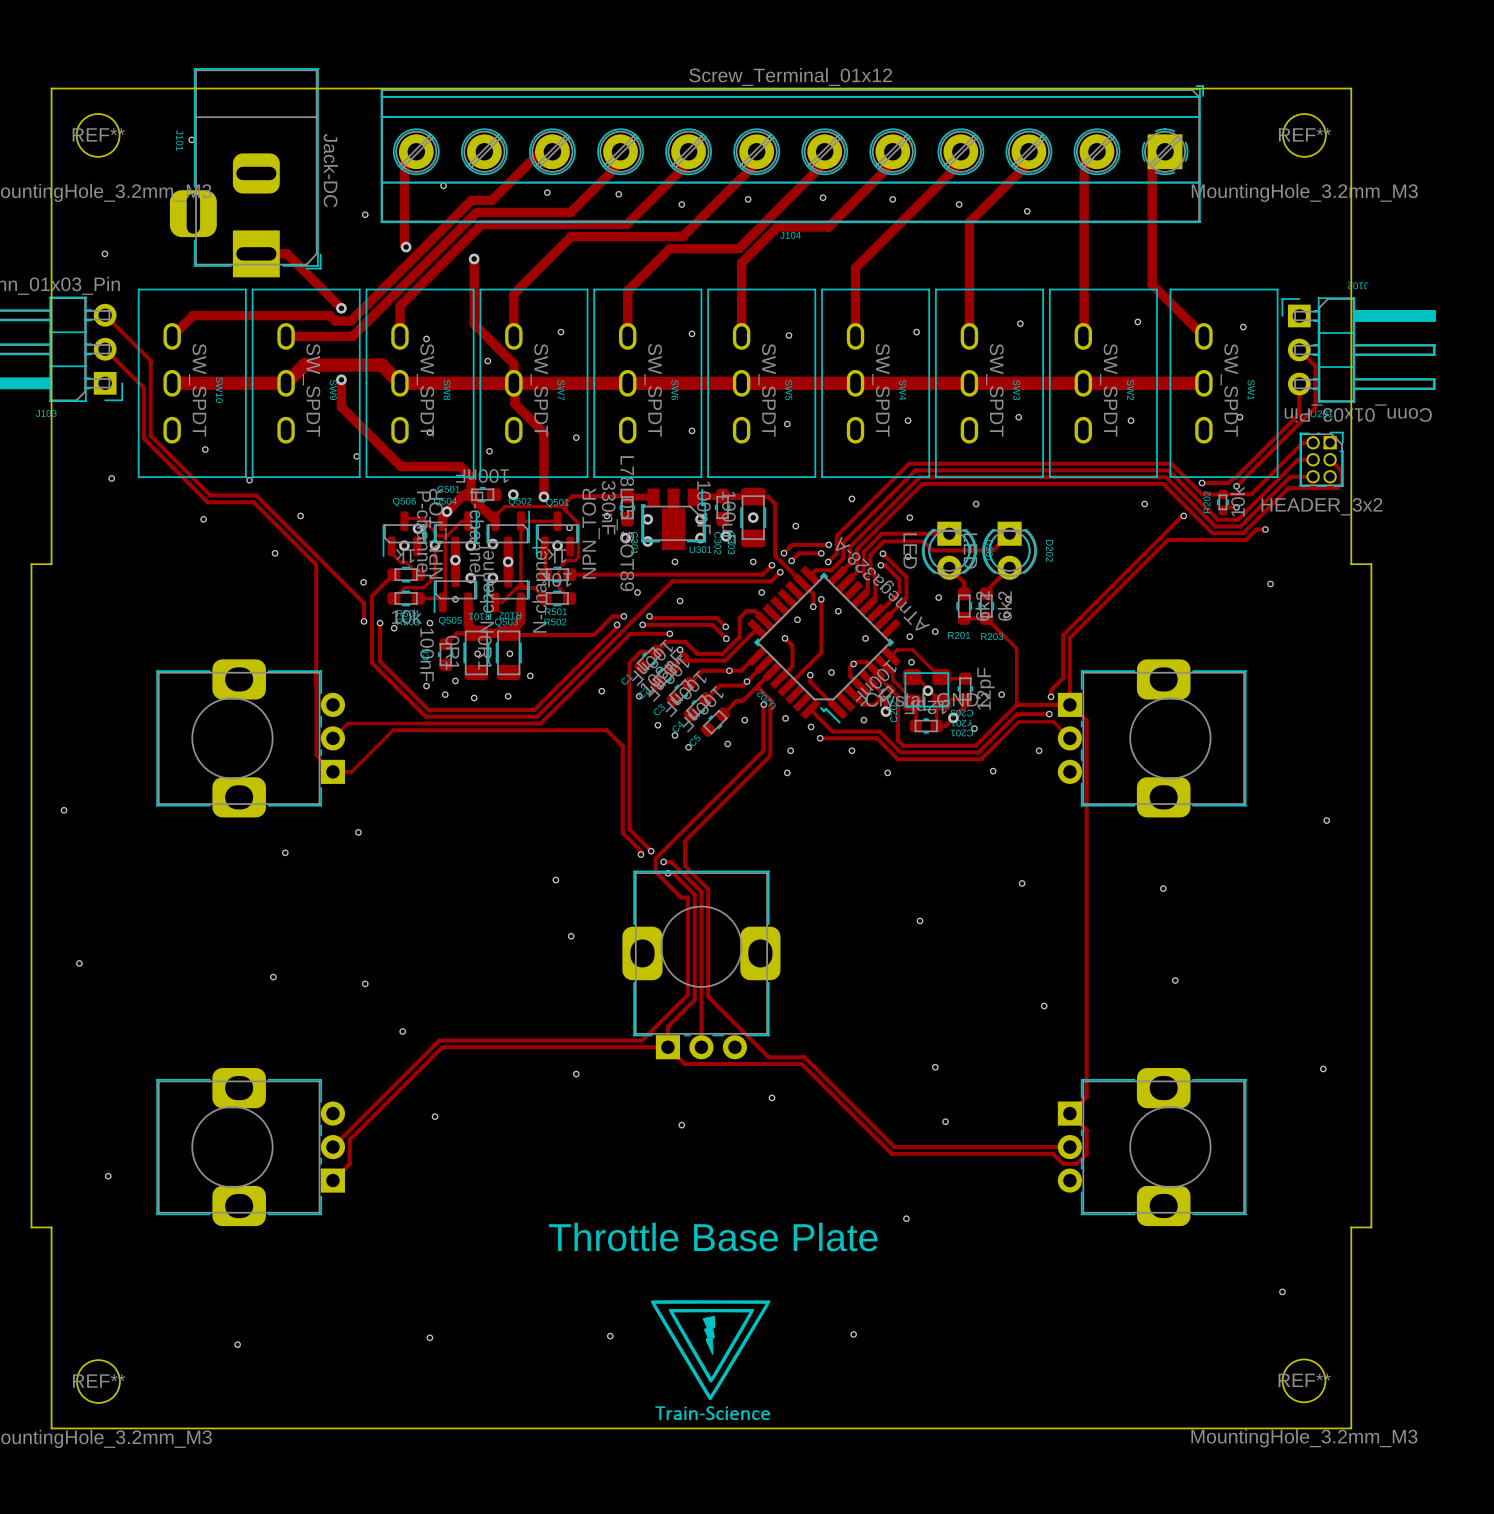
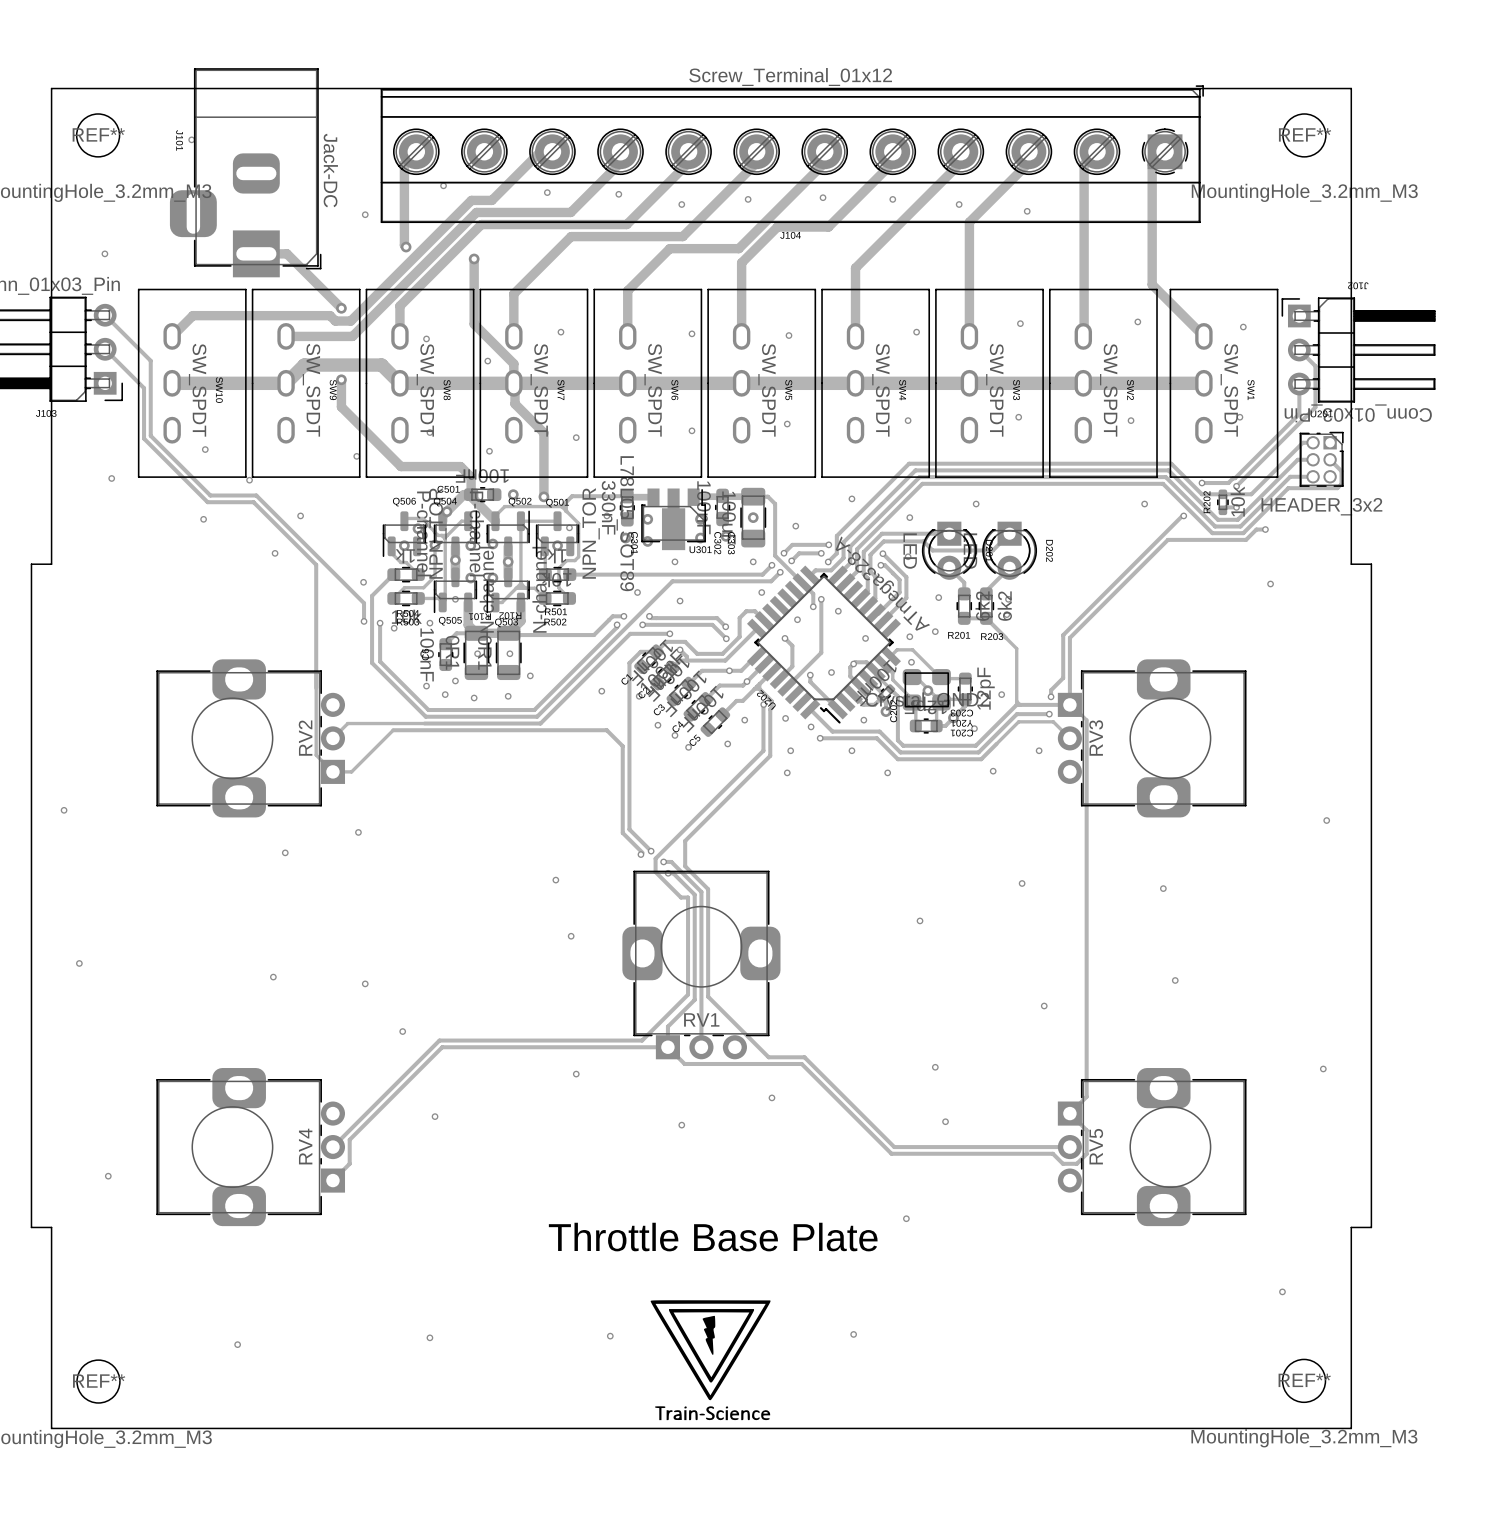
RV2 name: none -> RV2 (305, 738)
RV3 name: none -> RV3 (1096, 738)
RV1 name: none -> RV1 (701, 1019)
RV4 name: none -> RV4 (305, 1146)
RV5 name: none -> RV5 (1096, 1146)

